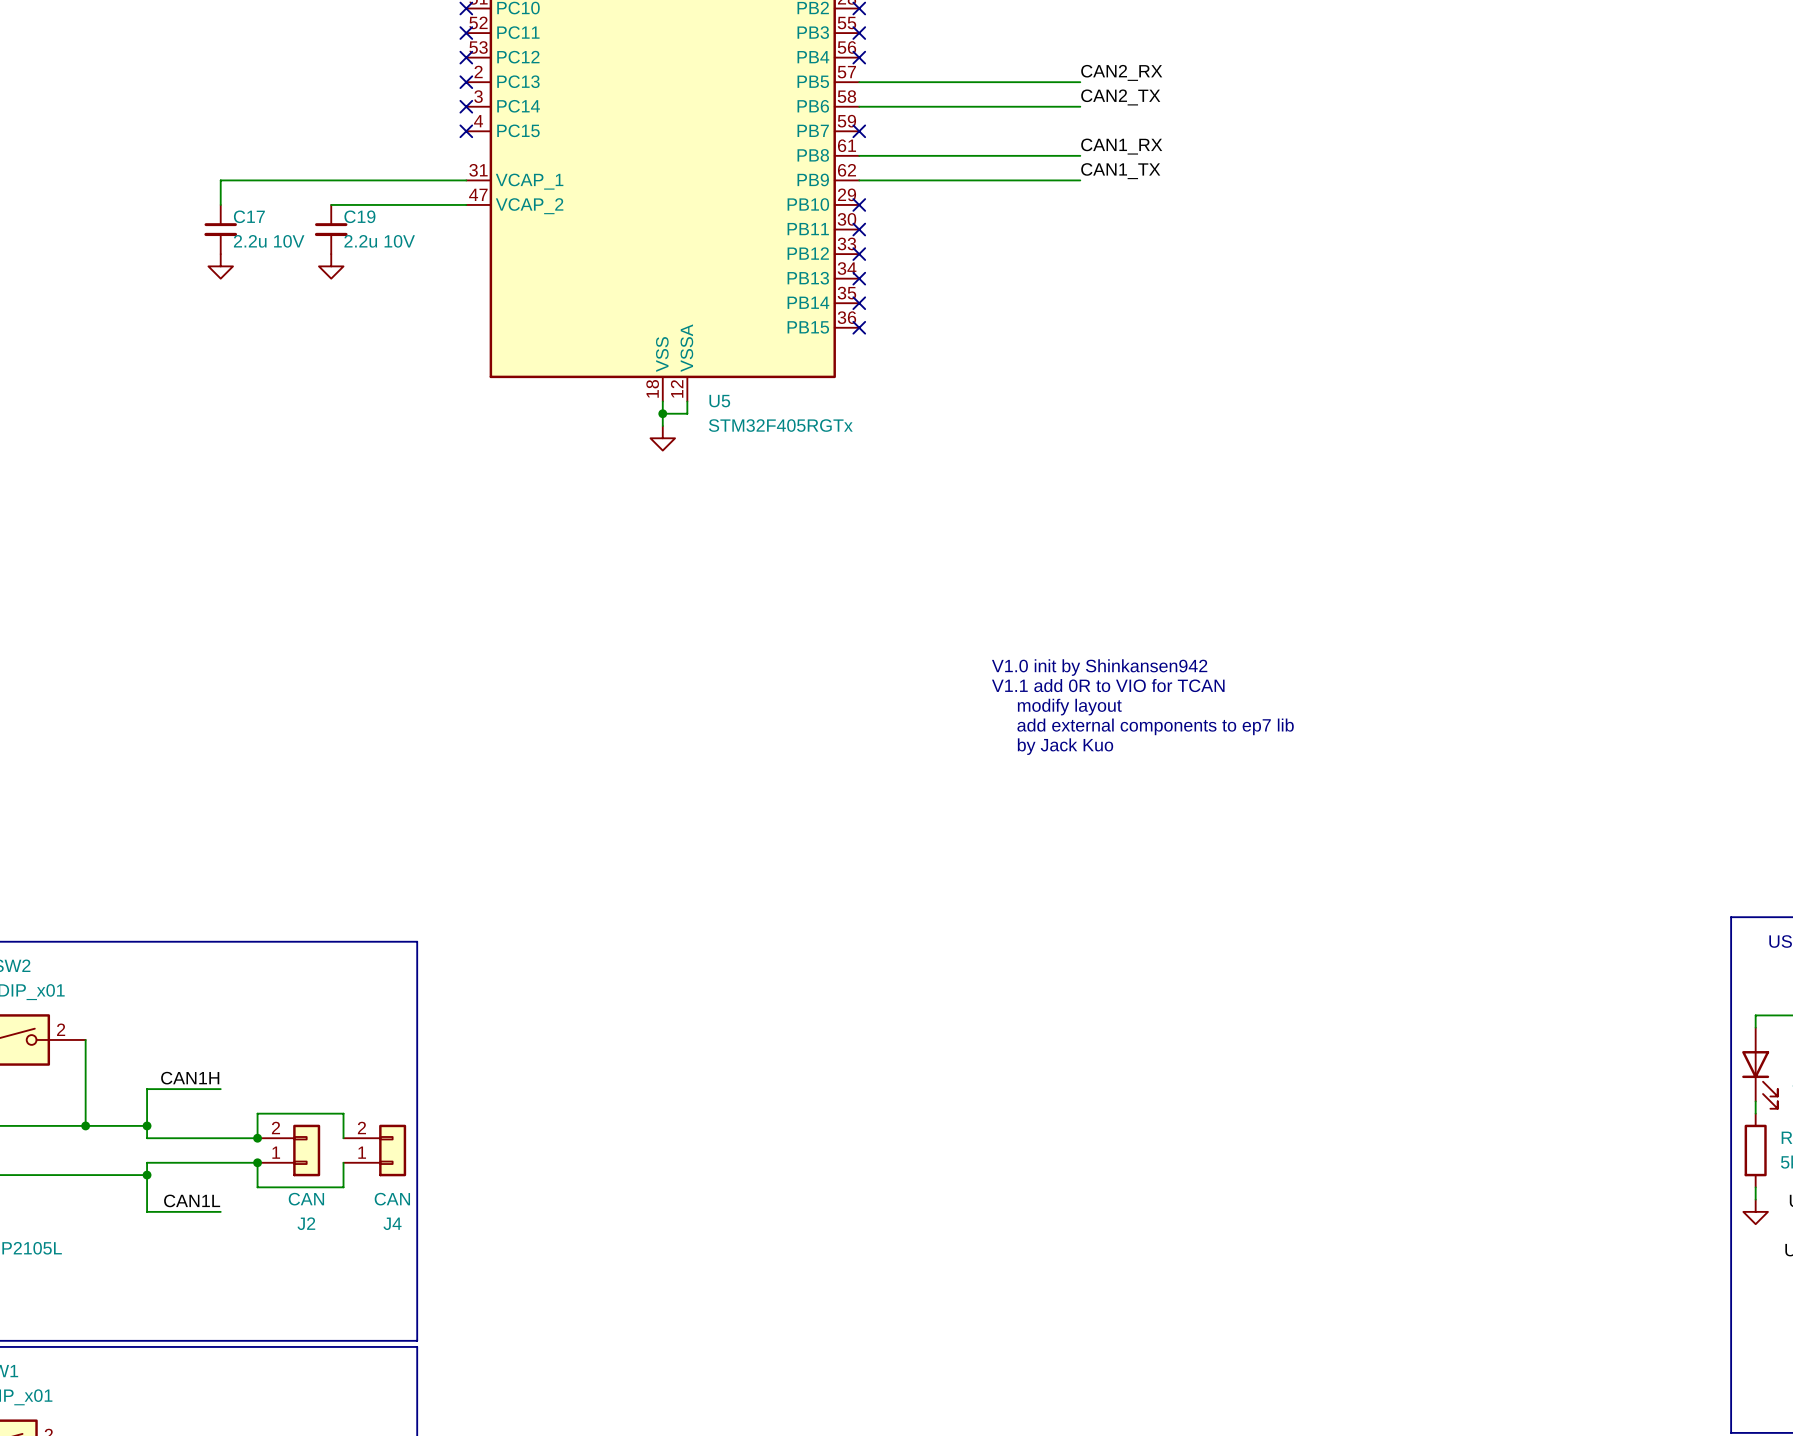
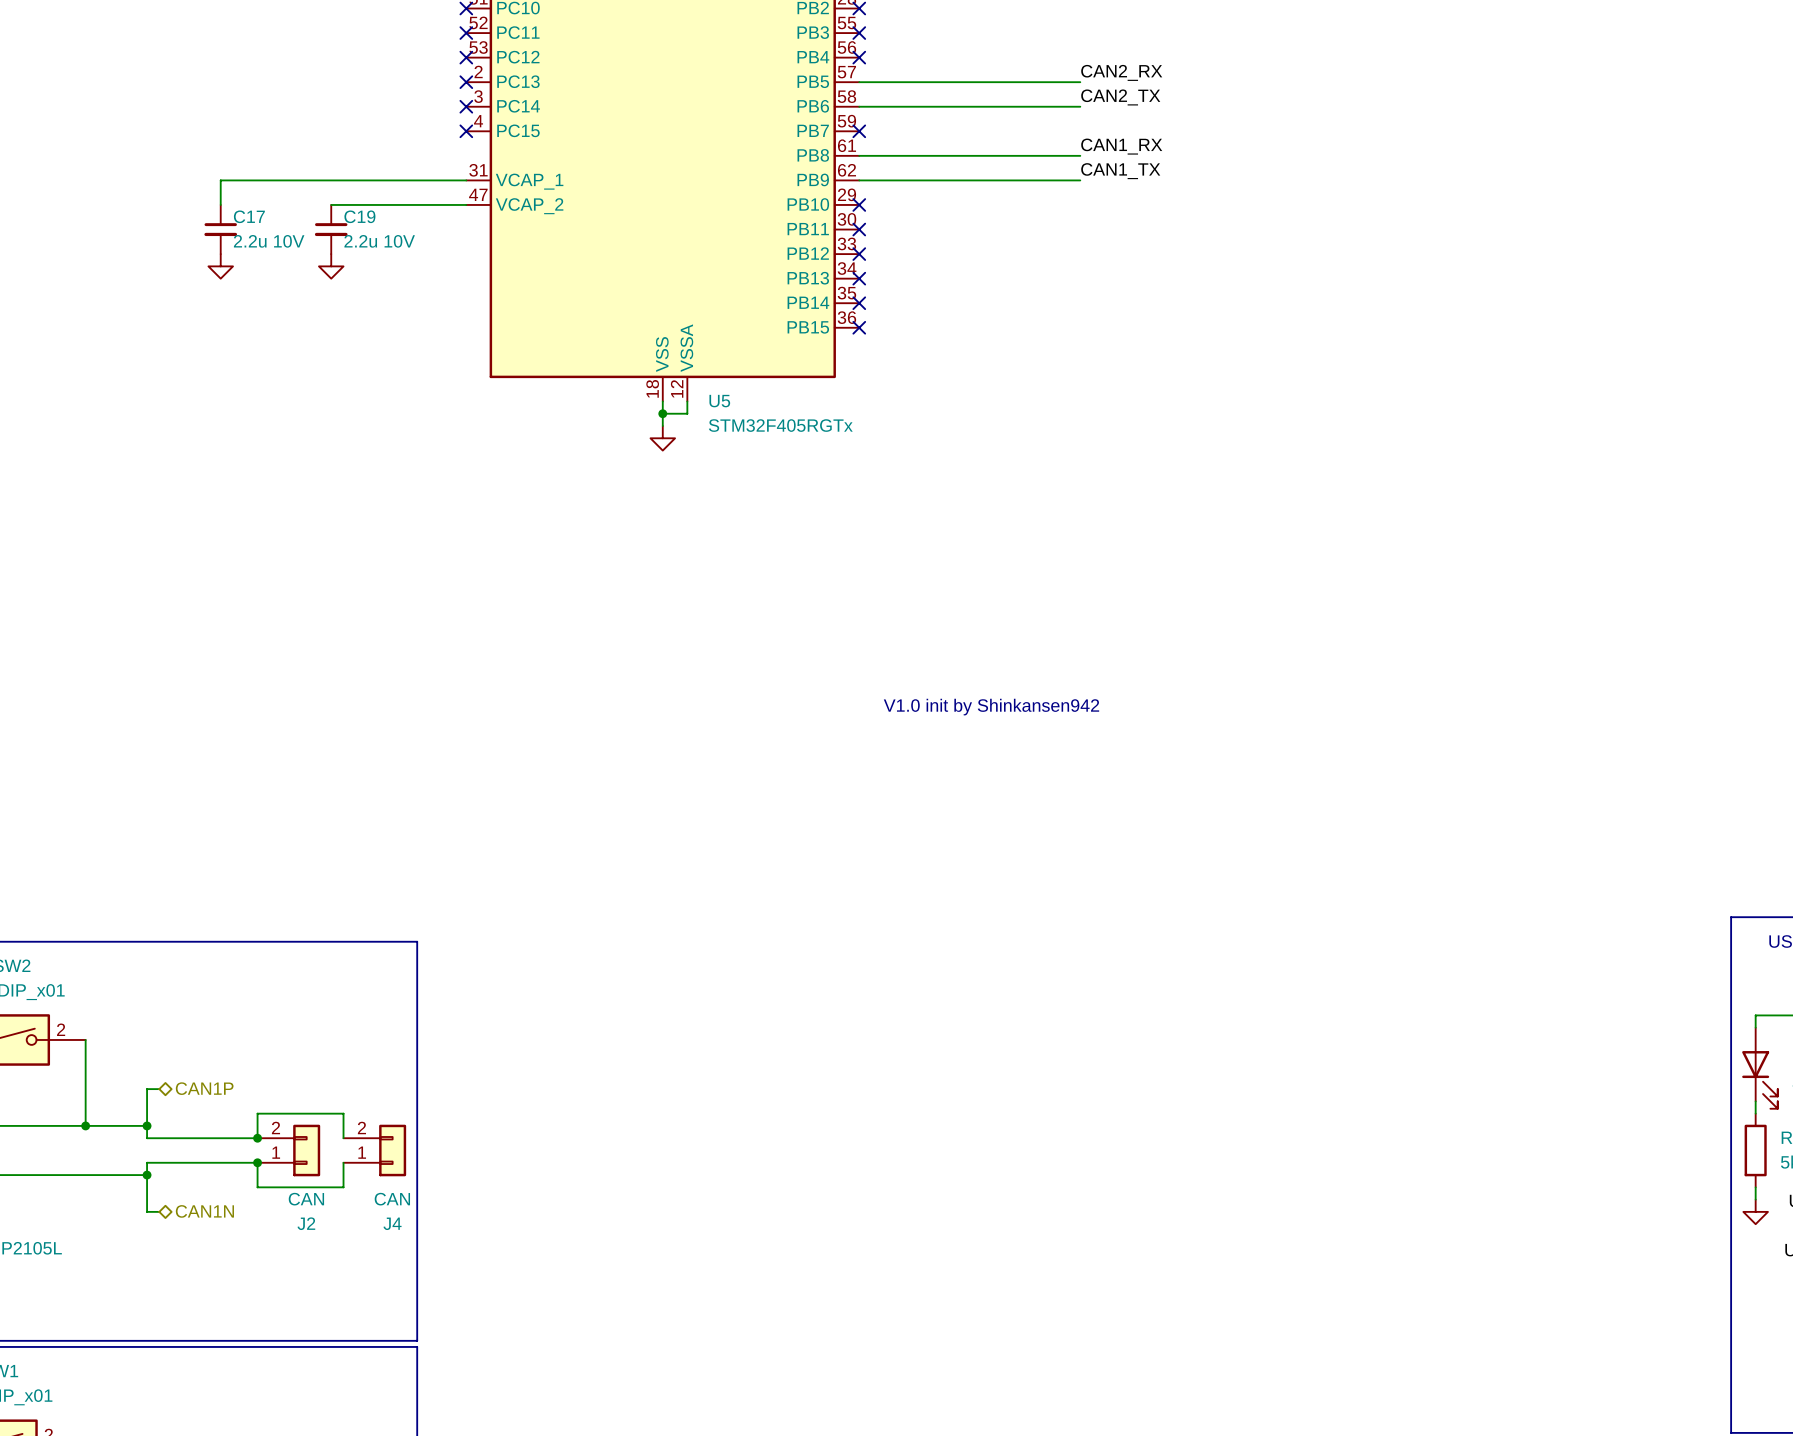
text: V1.0 init by Shinkansen942 (1099, 667) -> none
text: V1.1 add 0R to VIO for TCAN (1108, 685) -> none
text: modify layout (1069, 707) -> V1.0 init by Shinkansen942 (991, 707)
text: add external components to ep7 lib (1155, 726) -> none
text: by Jack Kuo (1065, 746) -> none
label: CAN1H (190, 1078) -> none
hierarchical label: none -> CAN1P (204, 1088)
wire: (159, 1089) (220, 1089) -> none
label: CAN1L (192, 1200) -> none
wire: (159, 1211) (220, 1211) -> none
hierarchical label: none -> CAN1N (204, 1211)

